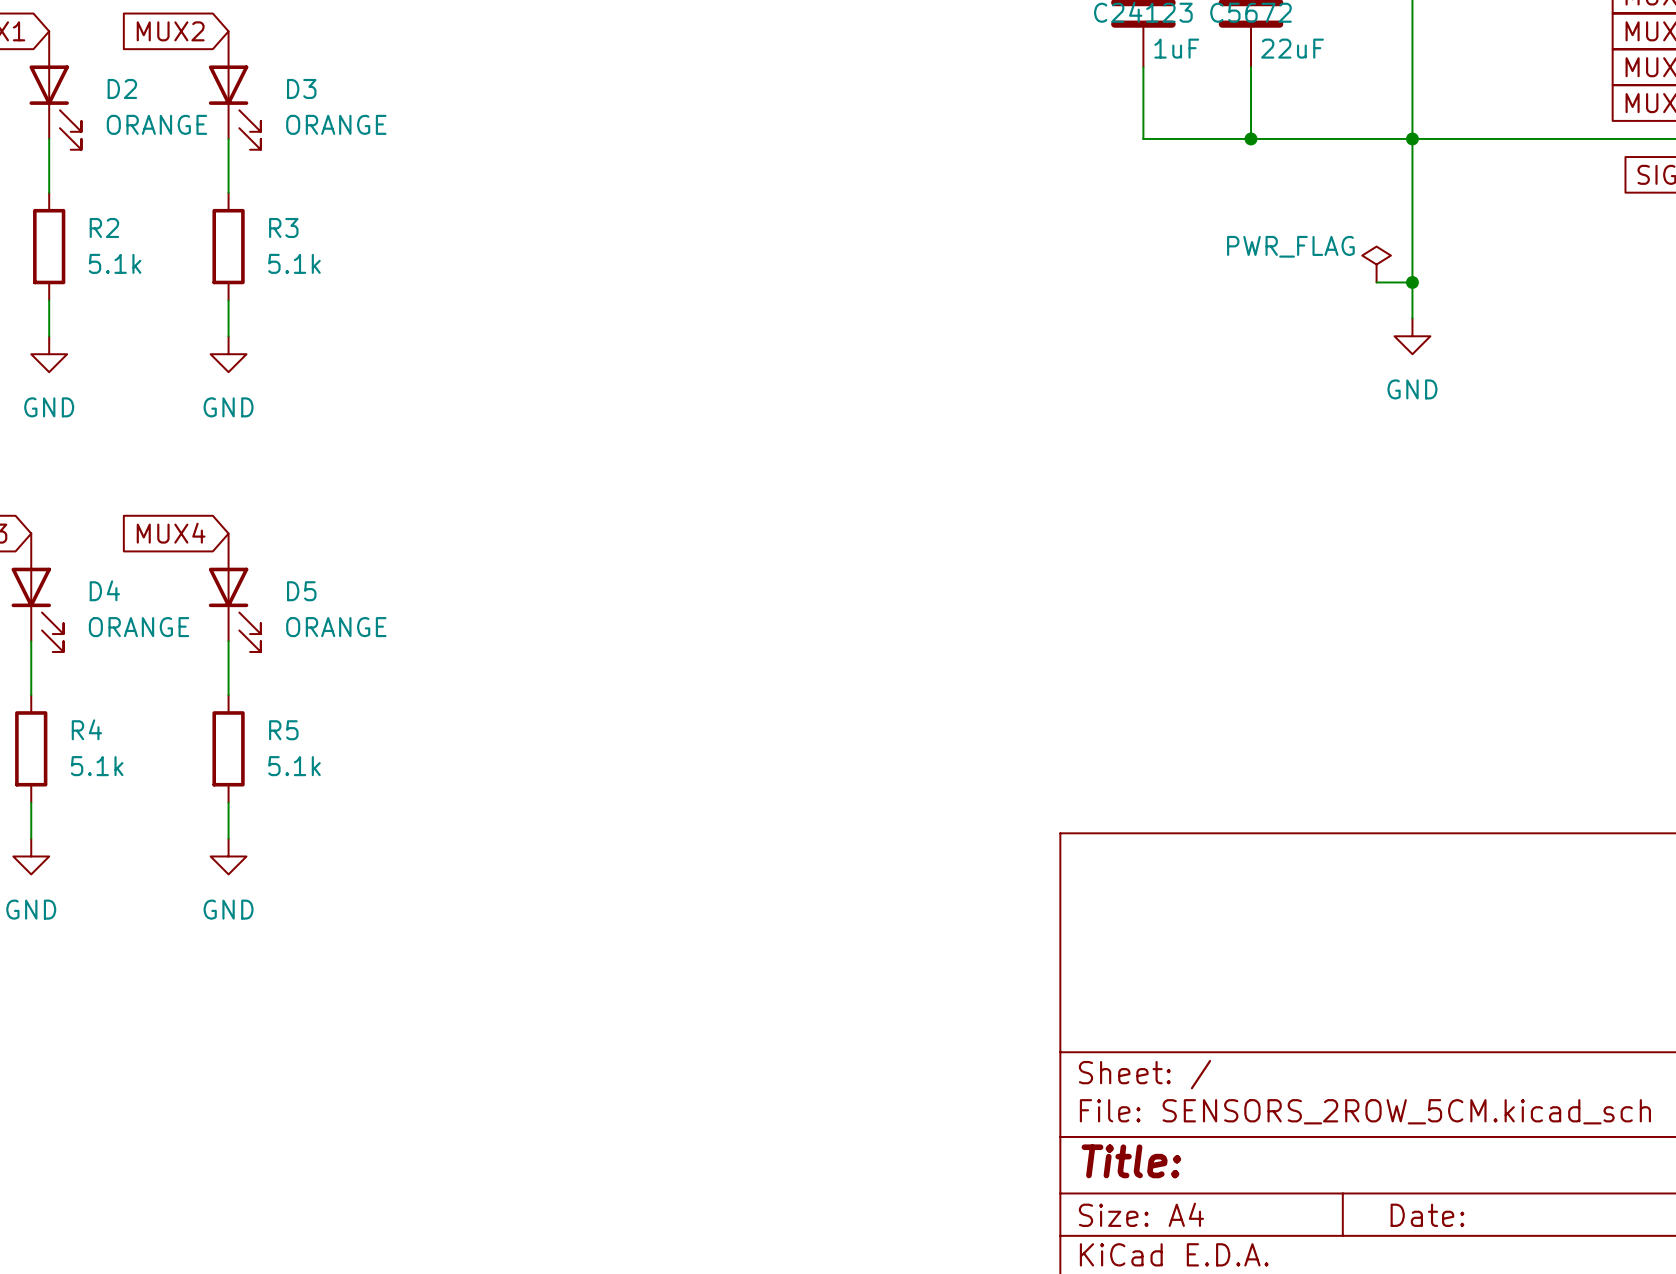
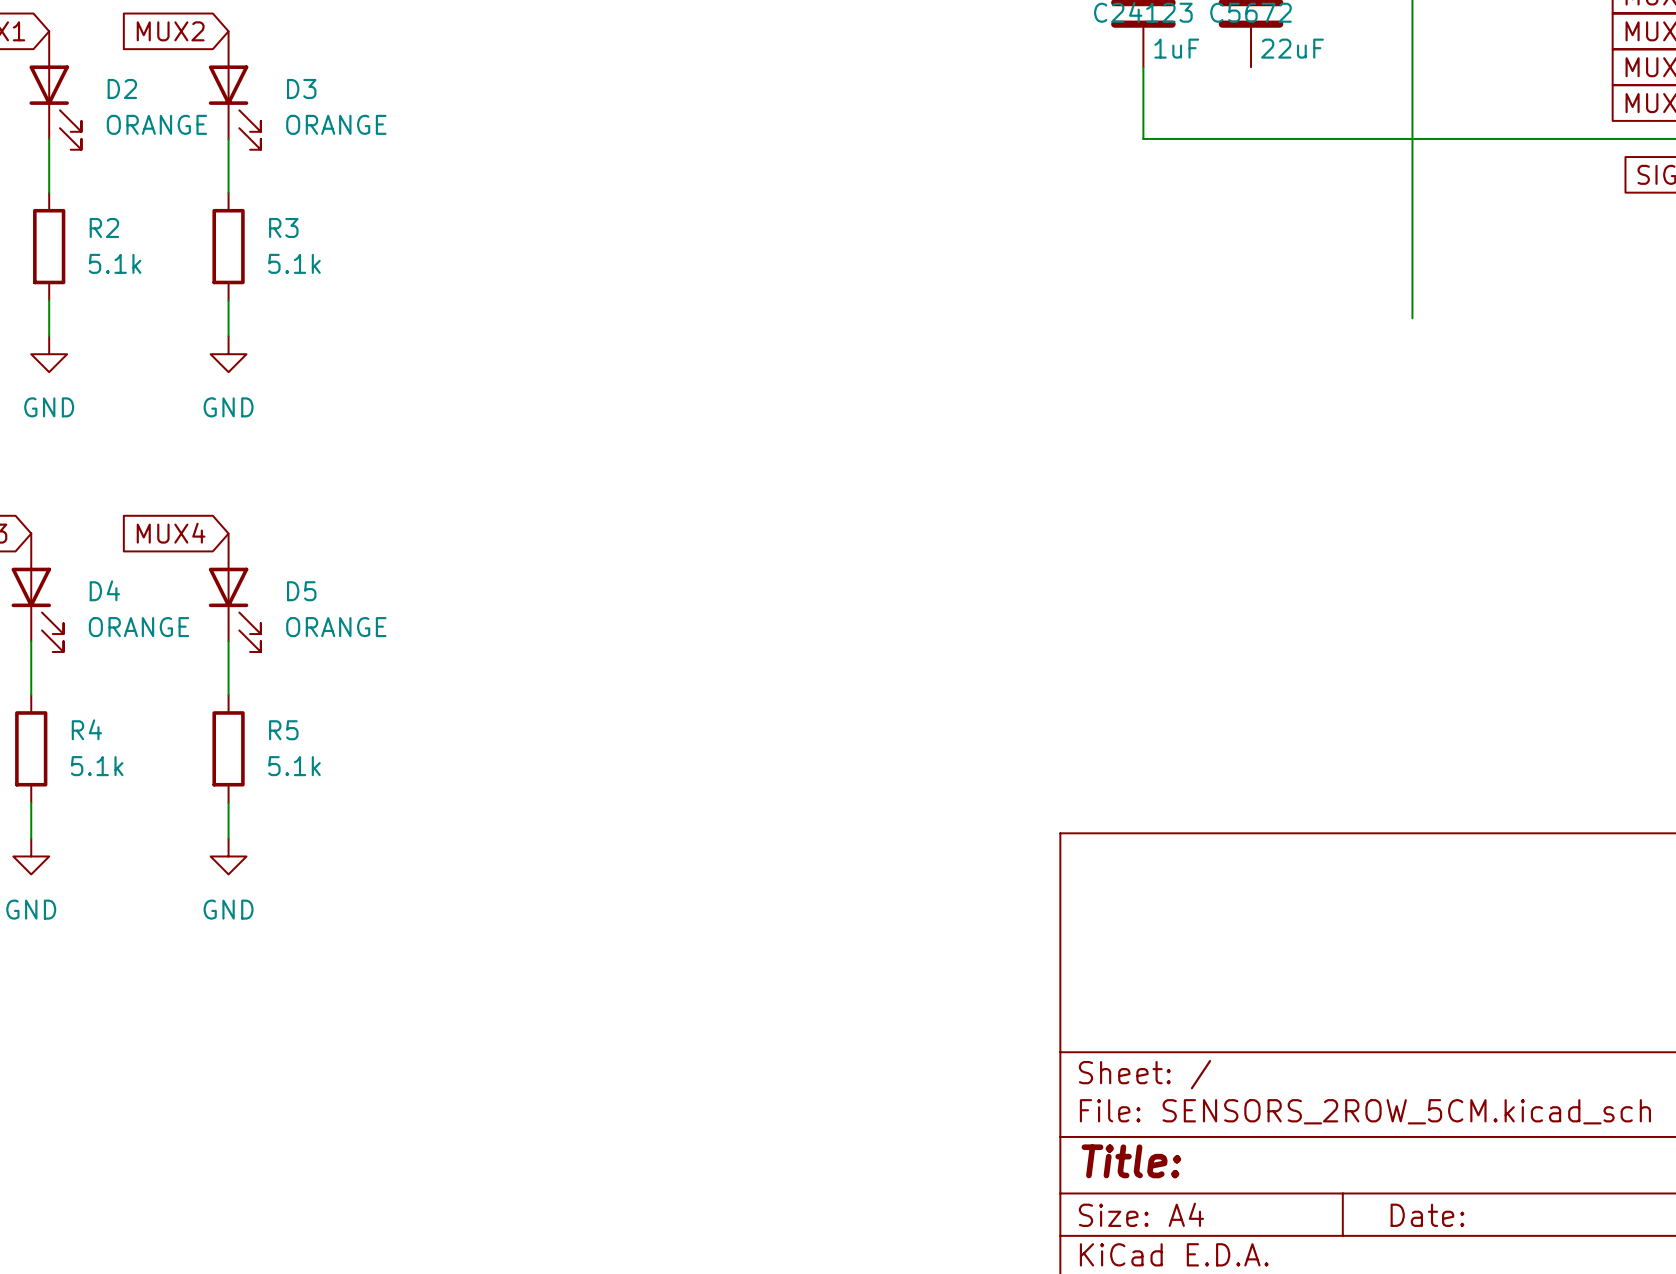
wire: (1251, 67) (1251, 138) -> none
junction: (1251, 138) -> none
junction: (1412, 138) -> none
power symbol: PWR_FLAG (1376, 264) -> none
wire: (1376, 282) (1412, 282) -> none
junction: (1412, 282) -> none
power symbol: GND (1412, 336) -> none

